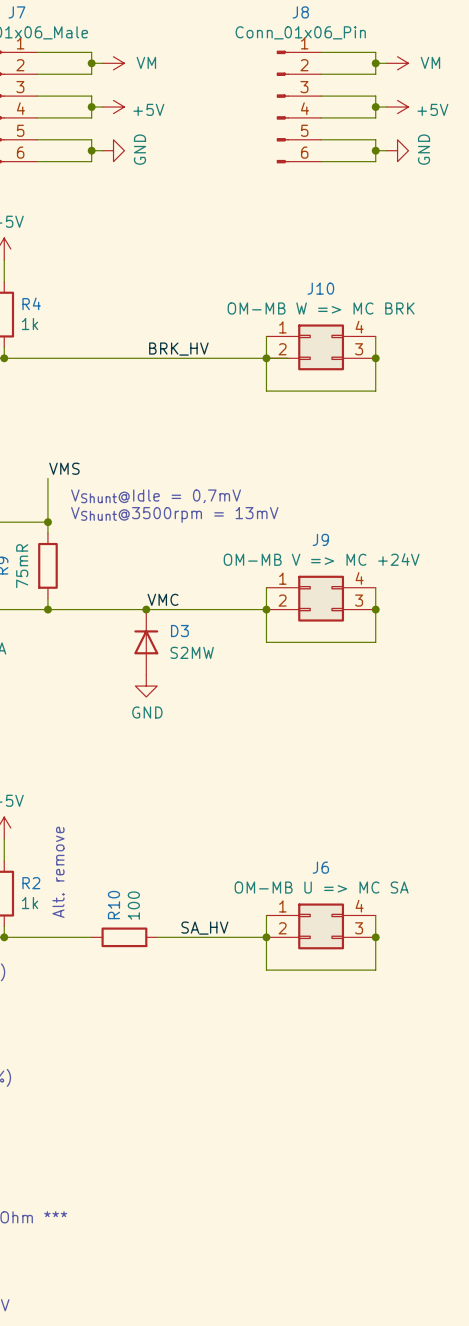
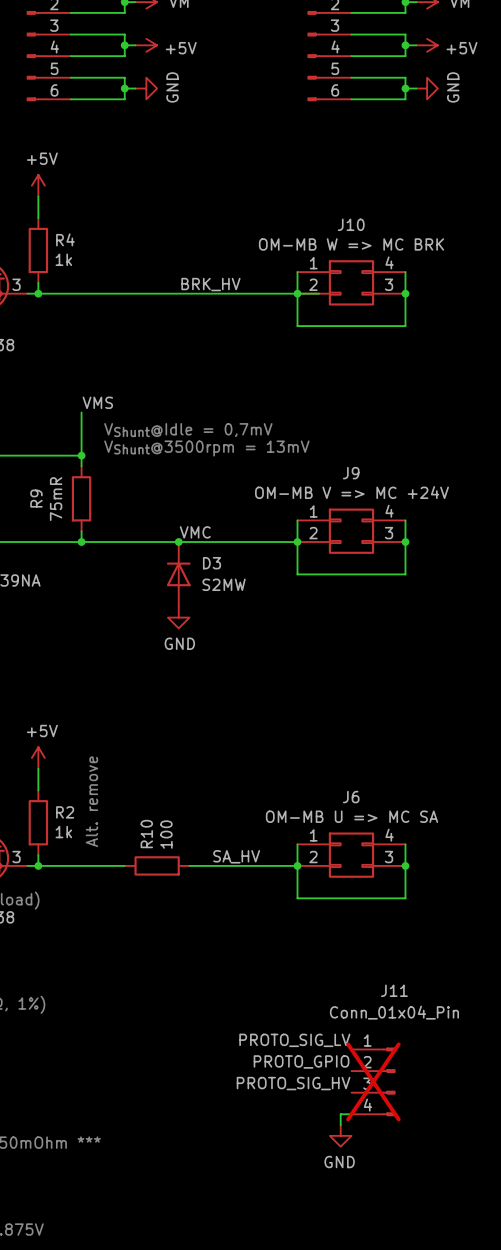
label: none -> PROTO_SIG_LV (294, 1040)
label: none -> PROTO_GPIO (301, 1061)
J11: none -> Conn_01x04_Pin (373, 1081)
label: none -> PROTO_SIG_HV (293, 1083)
wire: none -> (351, 1114) (340, 1114) (340, 1125)
power symbol: none -> GND (340, 1135)

